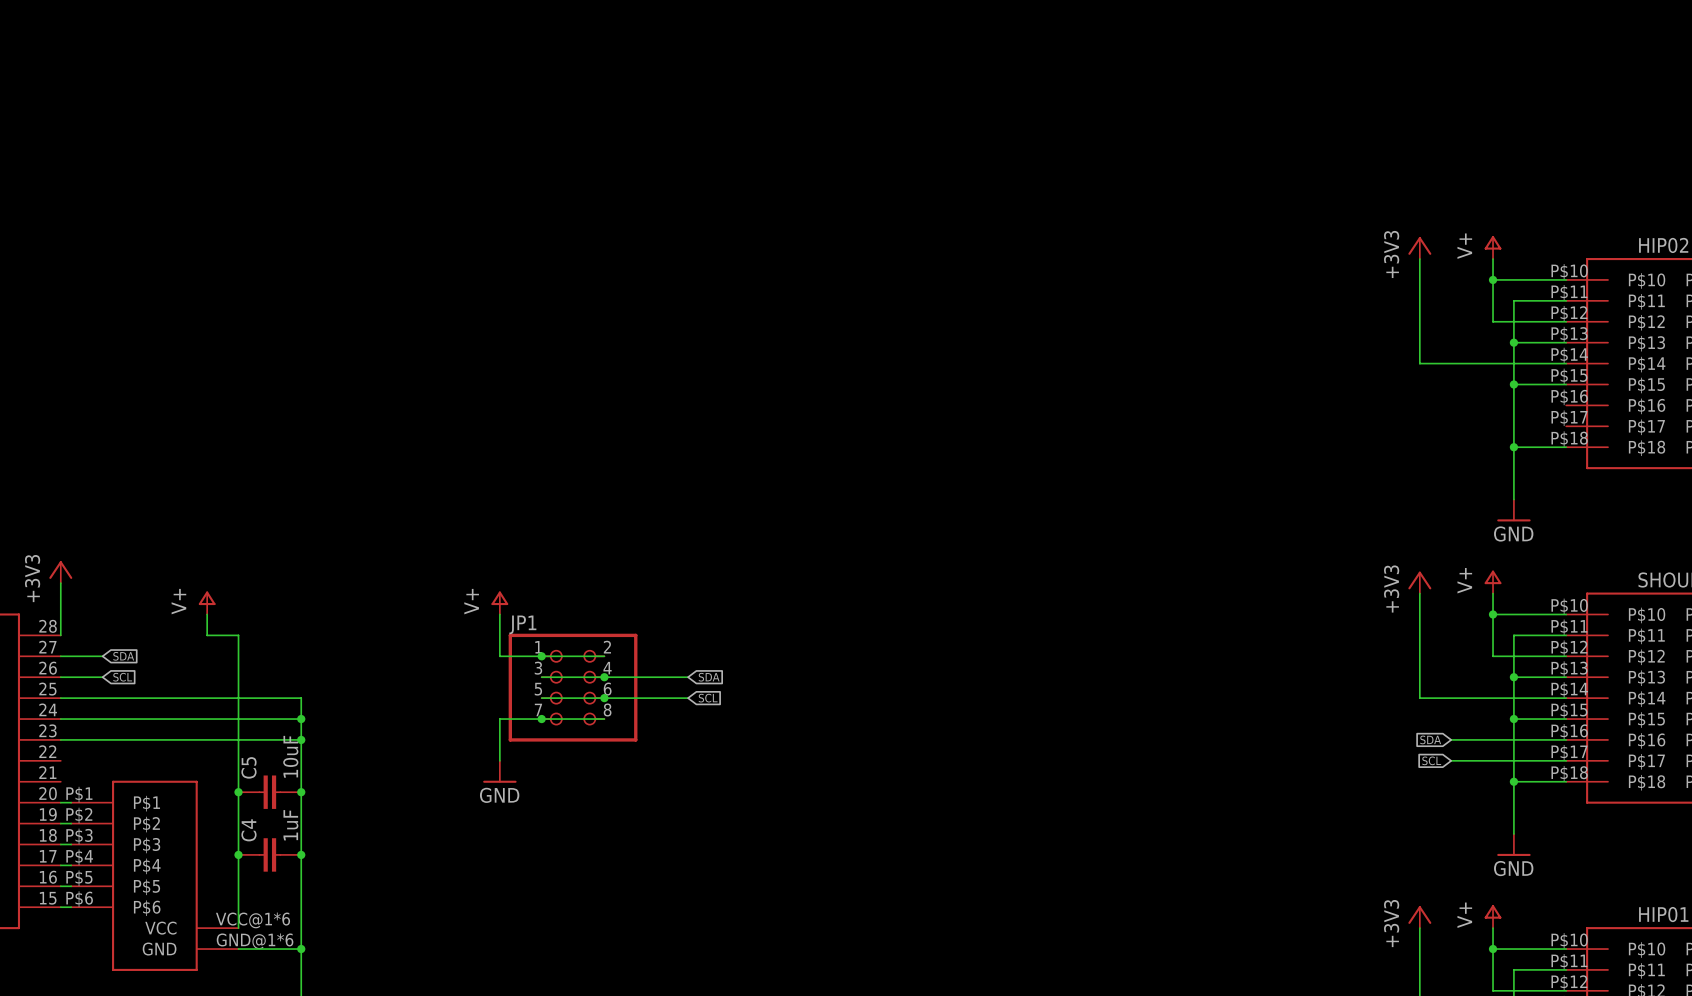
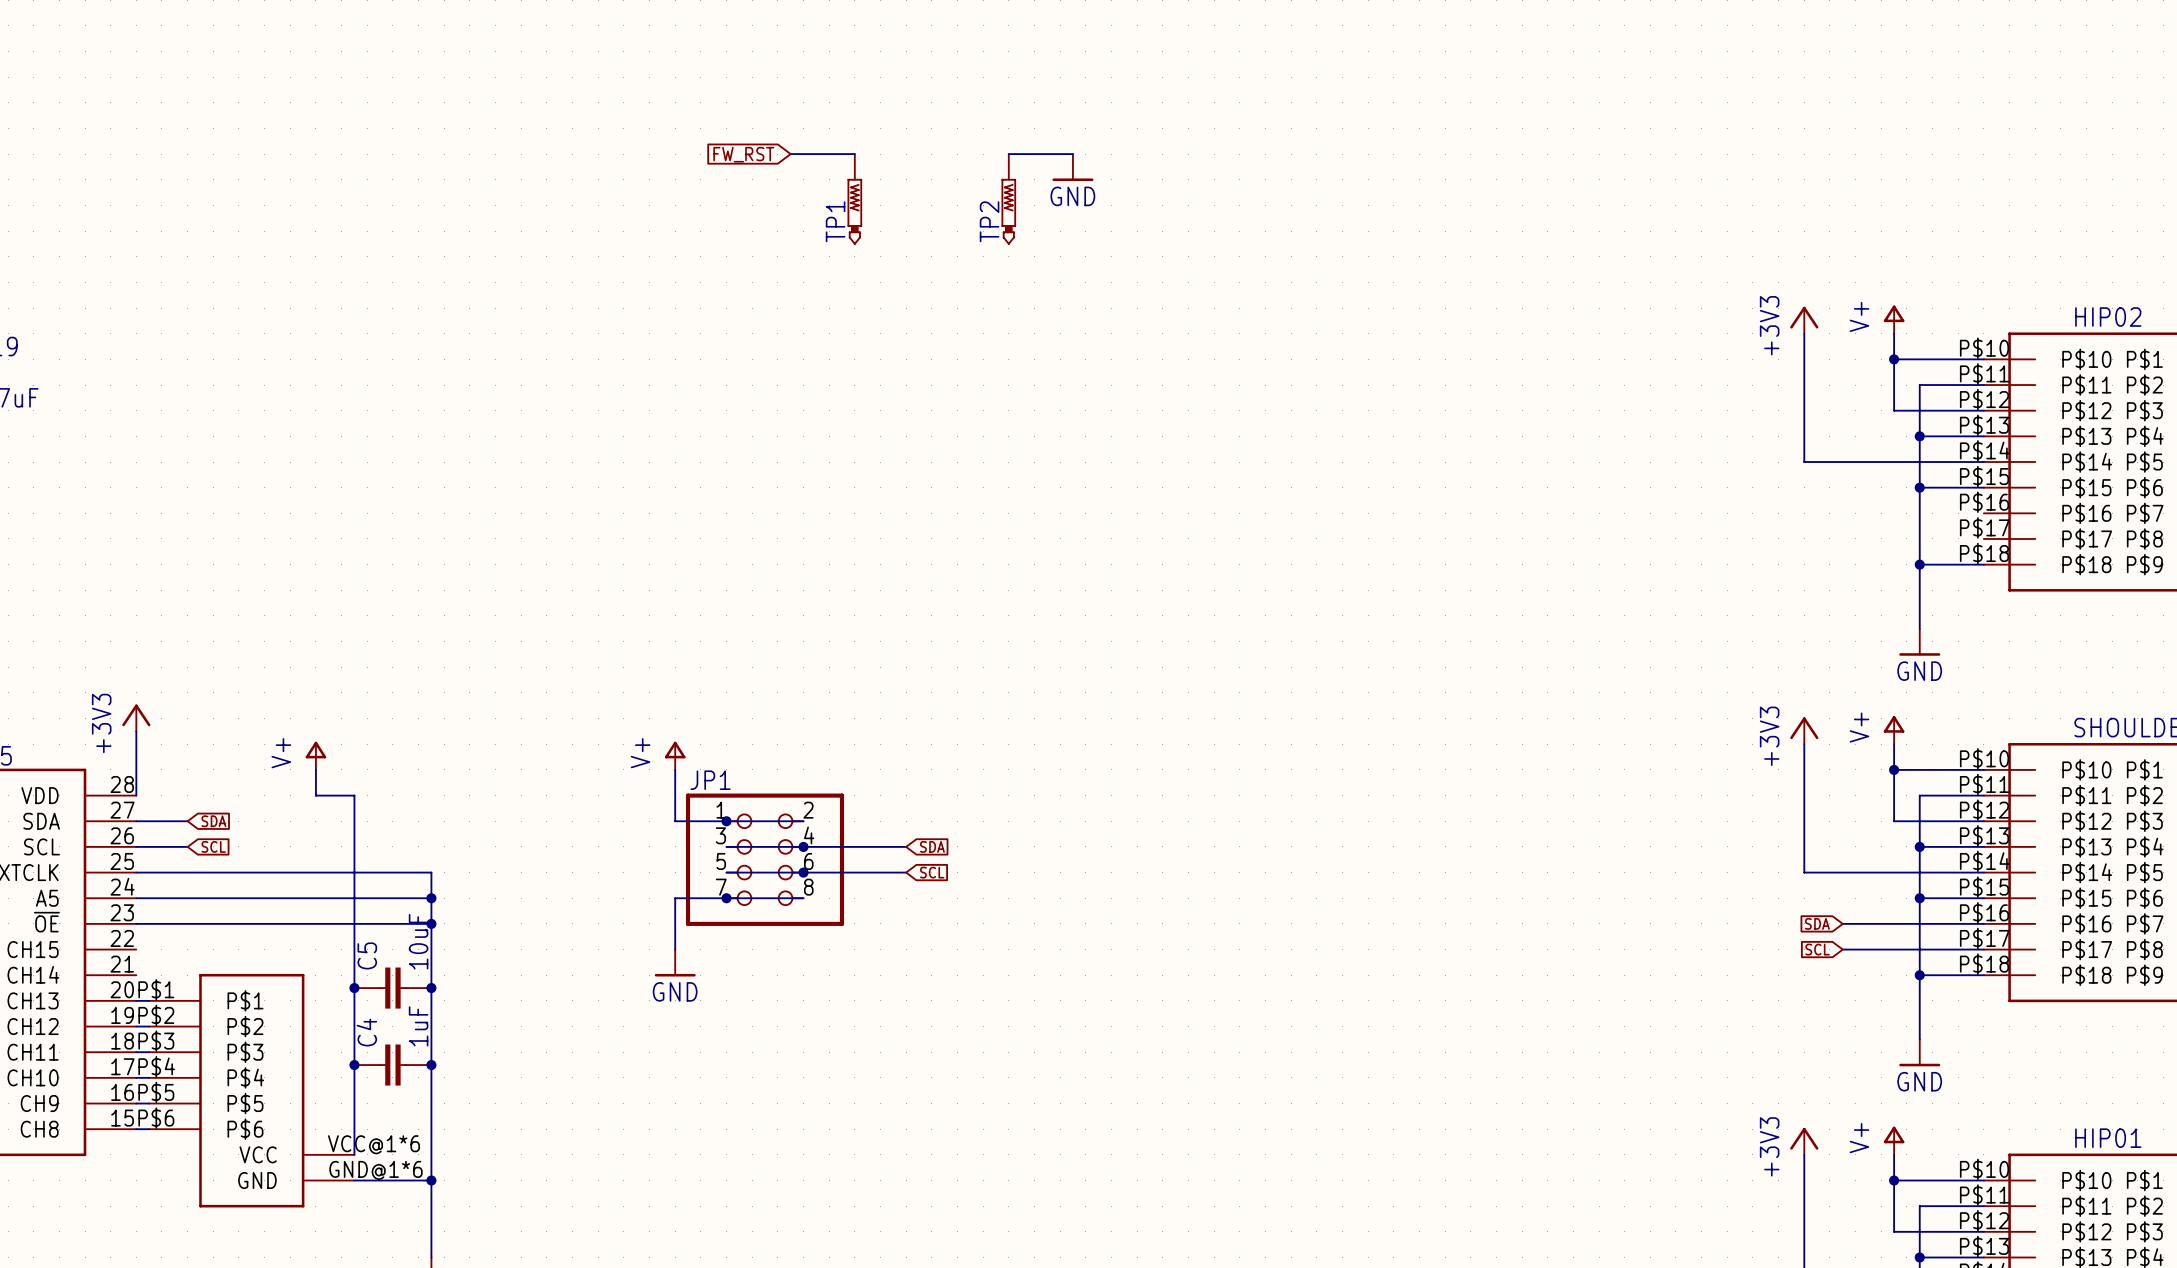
wire: none -> (790, 154) (854, 154)
wire: none -> (1008, 154) (1072, 154)
global label: none -> FW_RST (743, 154)
power symbol: none -> GND (1072, 167)
TP1: none -> (854, 199)
TP2: none -> (1008, 199)

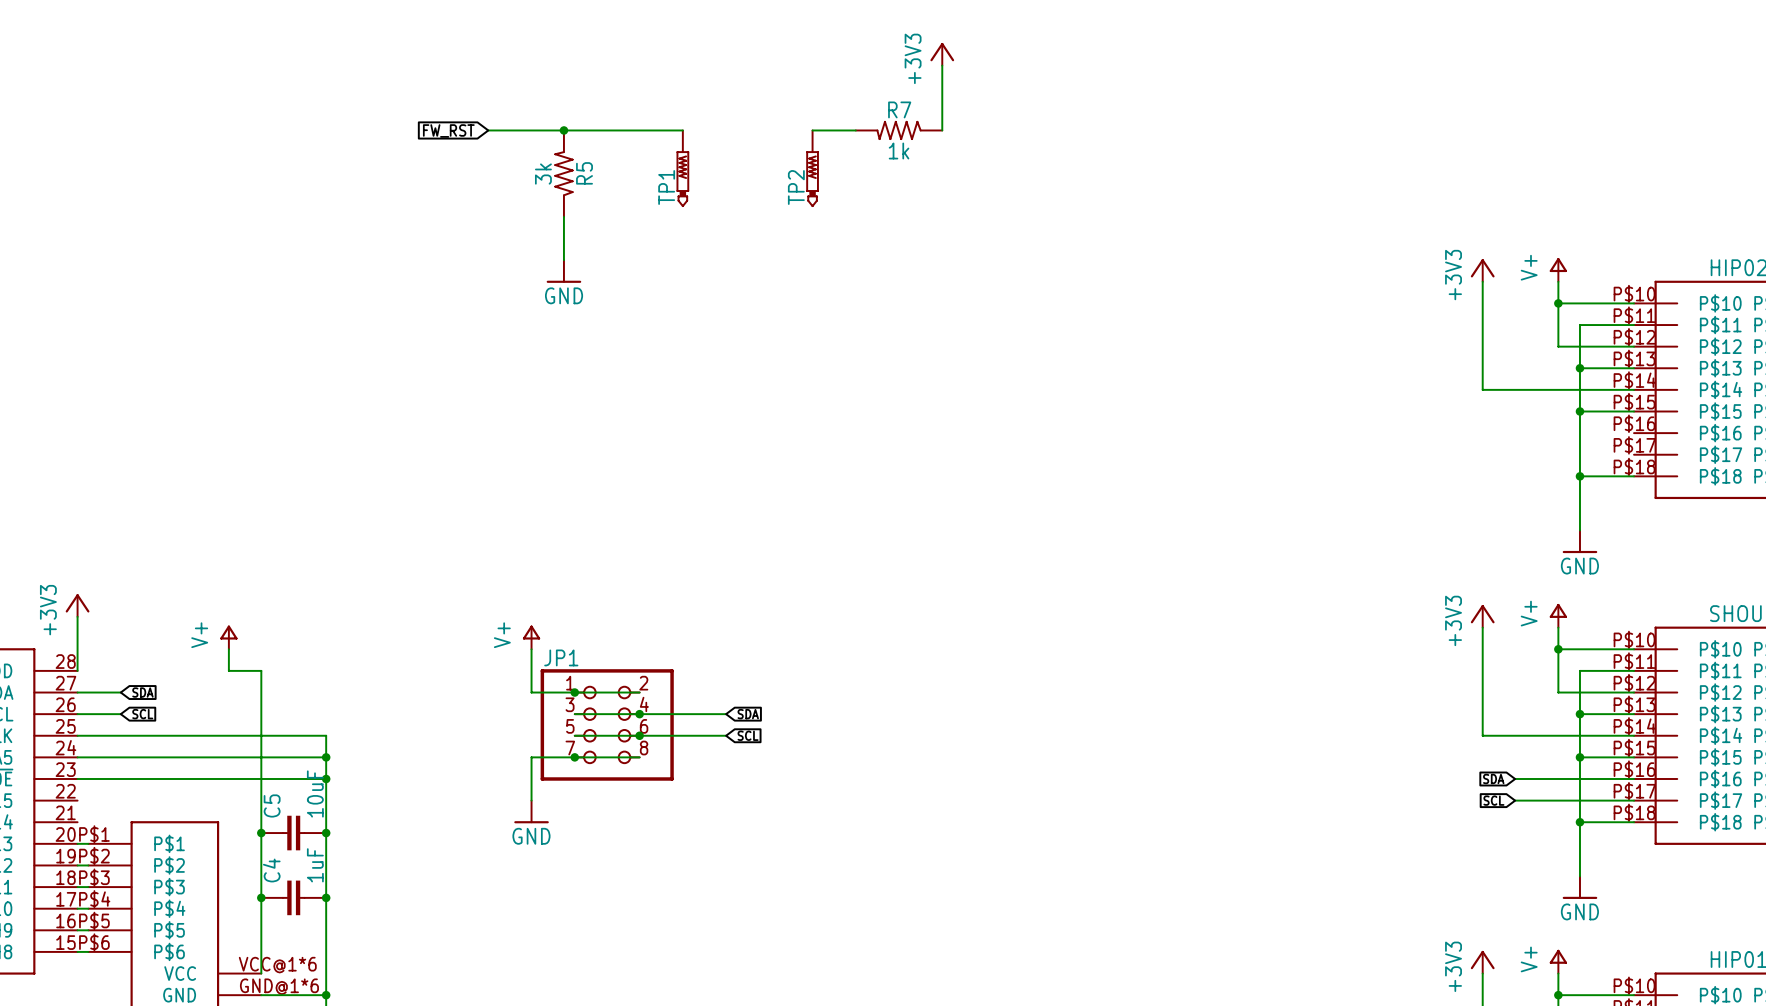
power symbol: none -> +3V3 (942, 54)
wire: none -> (942, 65) (942, 130)
wire: none -> (488, 130) (628, 130)
junction: none -> (563, 130)
global label position: FW_RST (743, 154) -> FW_RST (448, 130)
R7: none -> 1k (899, 130)
power symbol: GND (1072, 167) -> none
R5: none -> 3k (563, 173)
wire: none -> (563, 216) (563, 260)
power symbol: none -> GND (563, 271)

